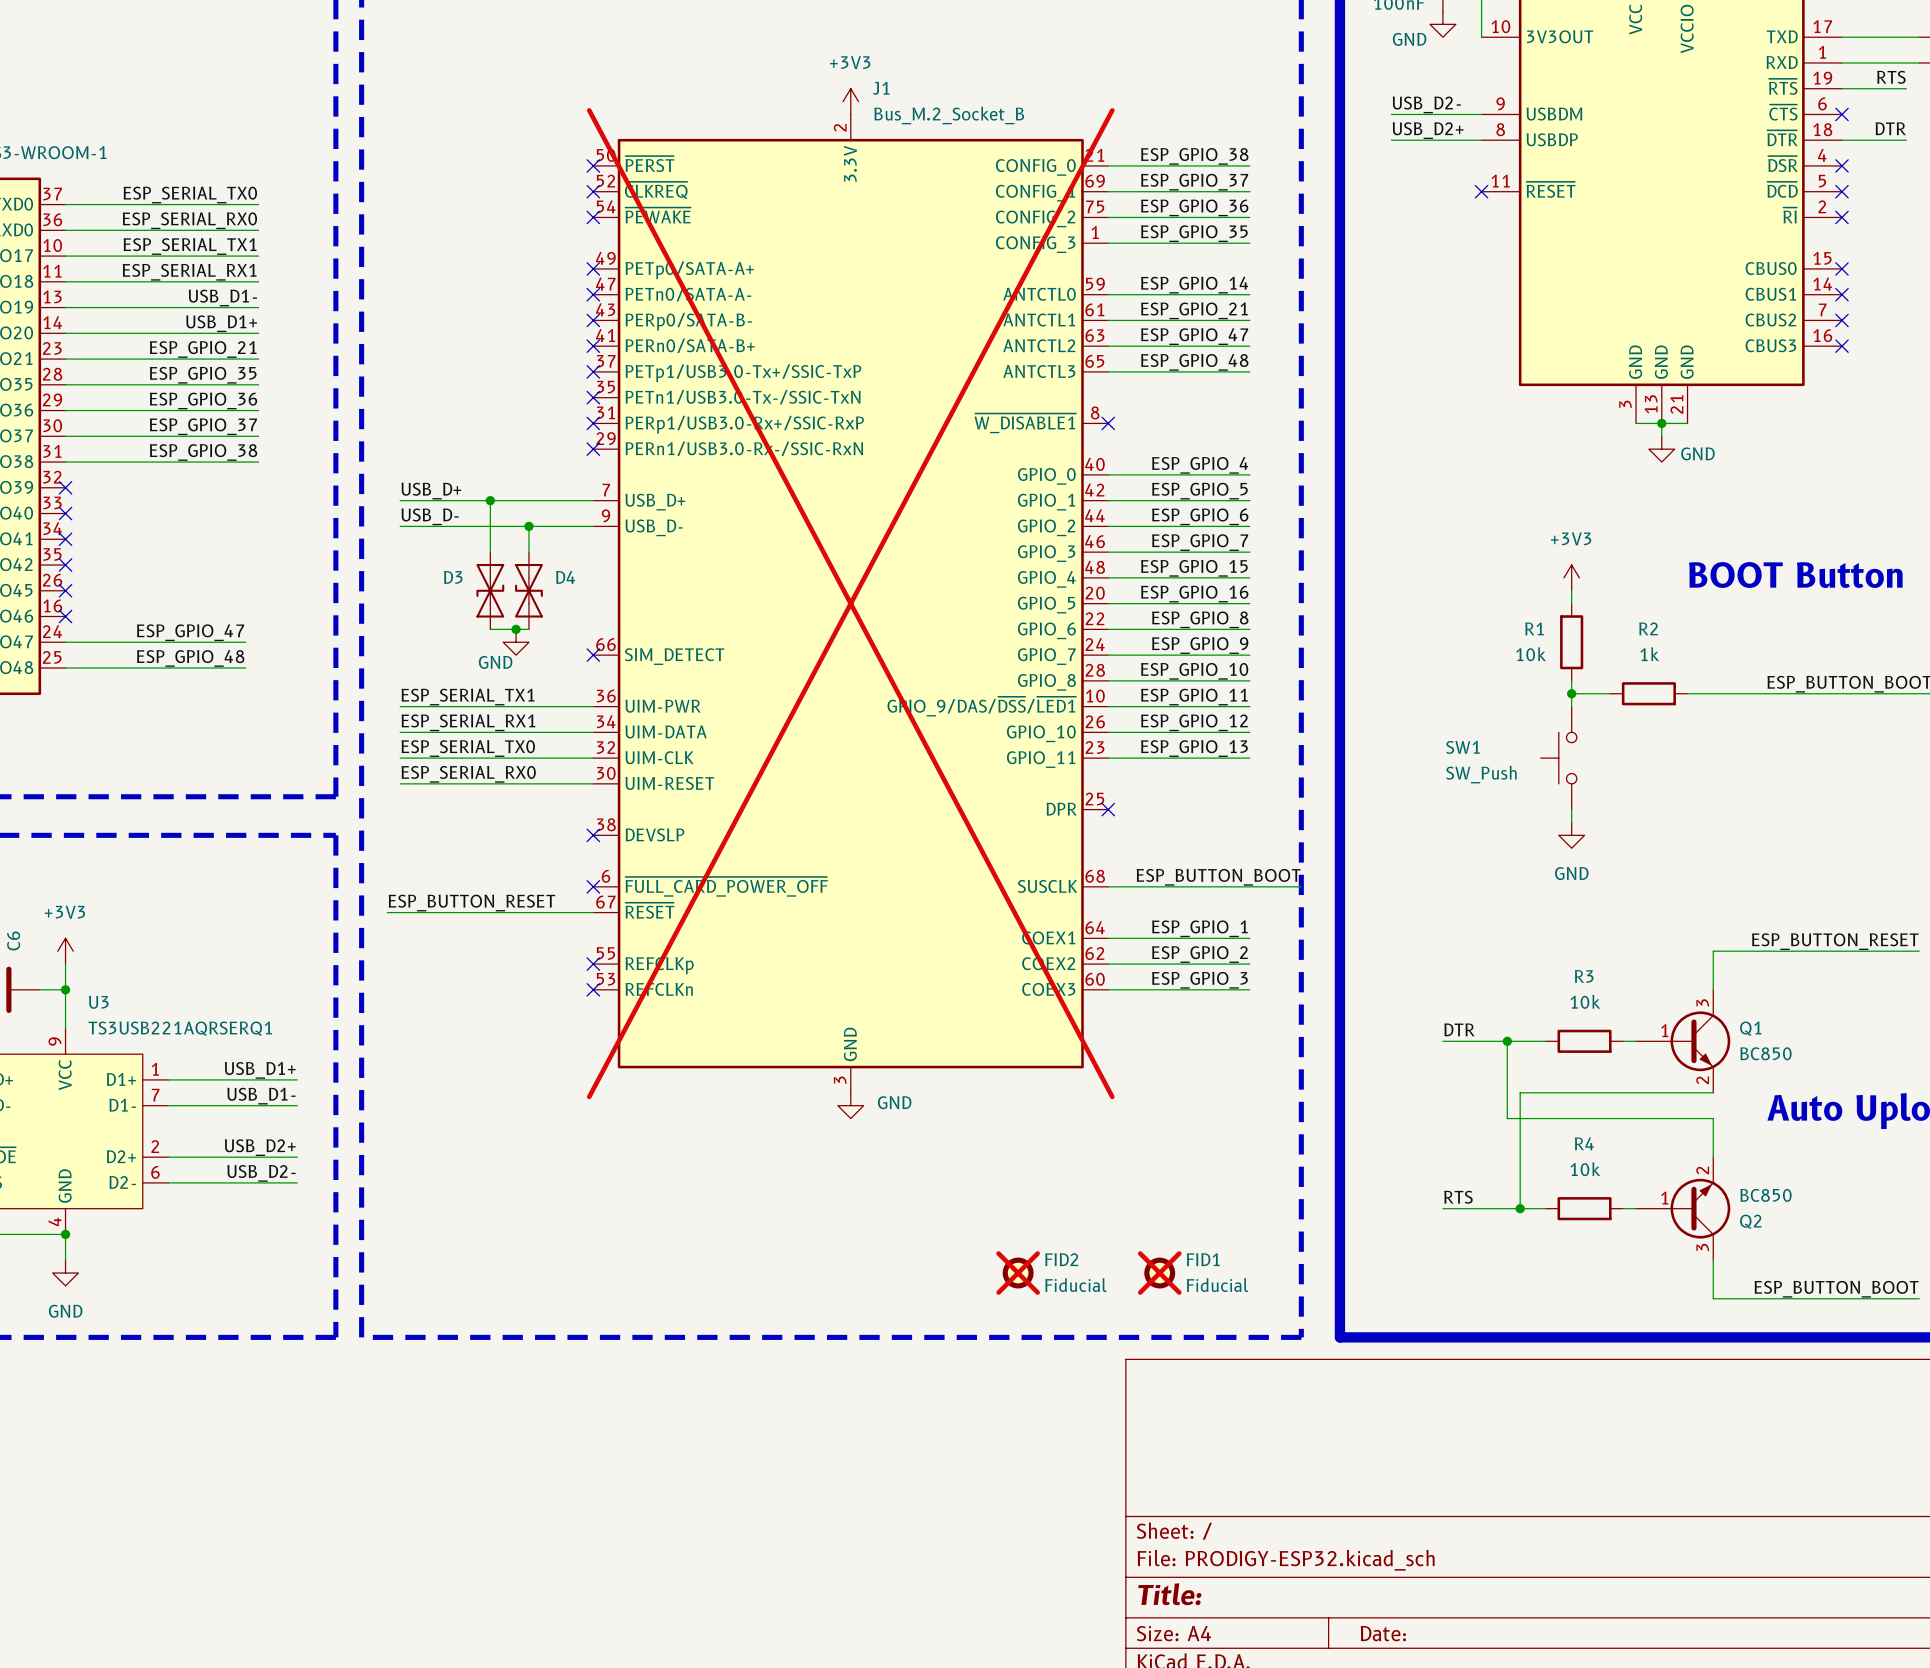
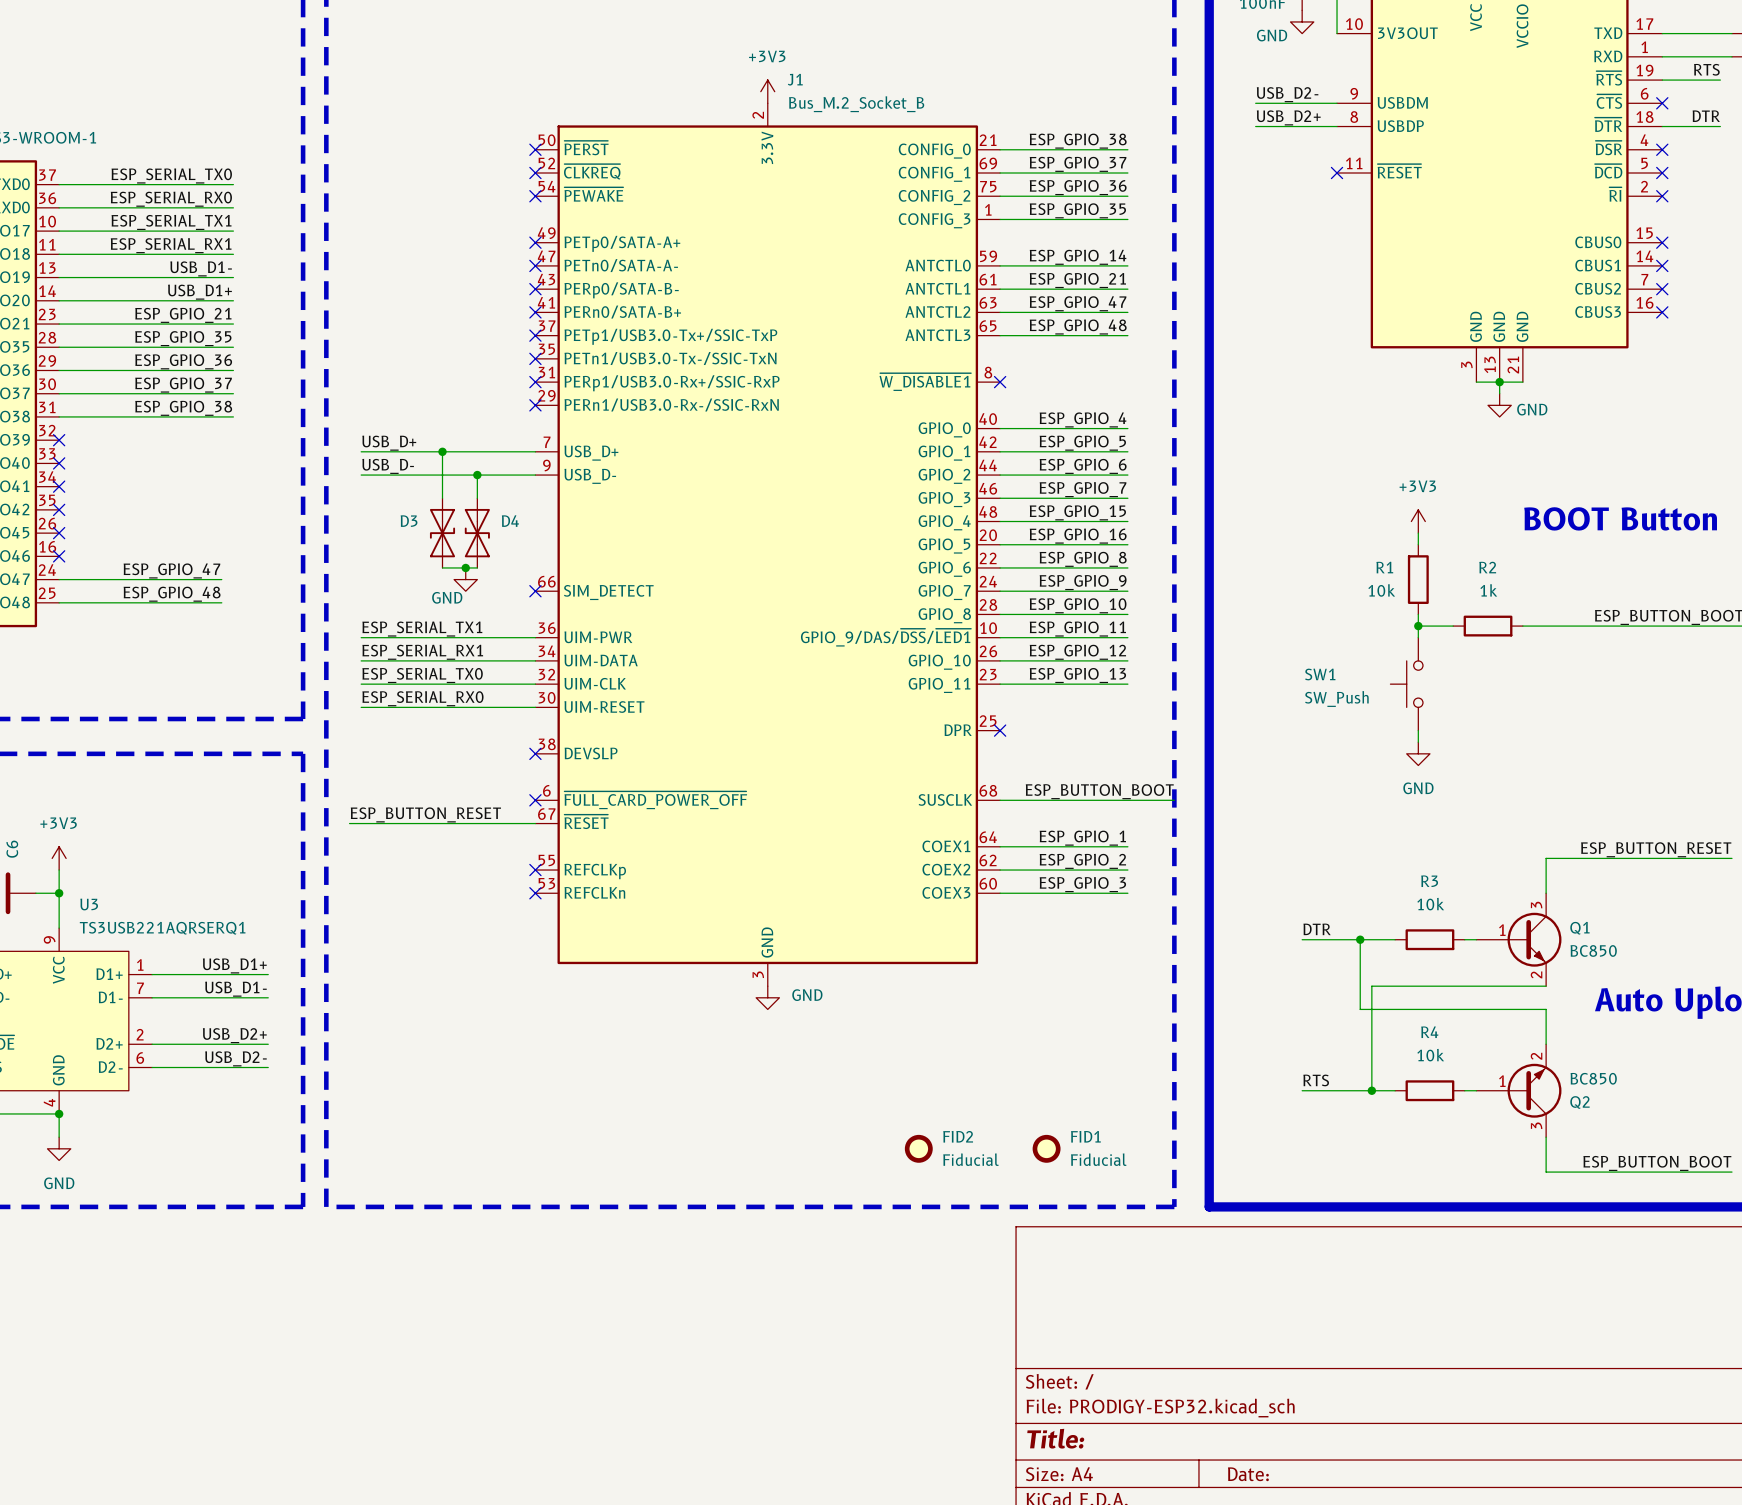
J1 do-not-place cross: (850, 603) -> none
FID2 do-not-place cross: (1018, 1273) -> none
FID1 do-not-place cross: (1159, 1273) -> none

